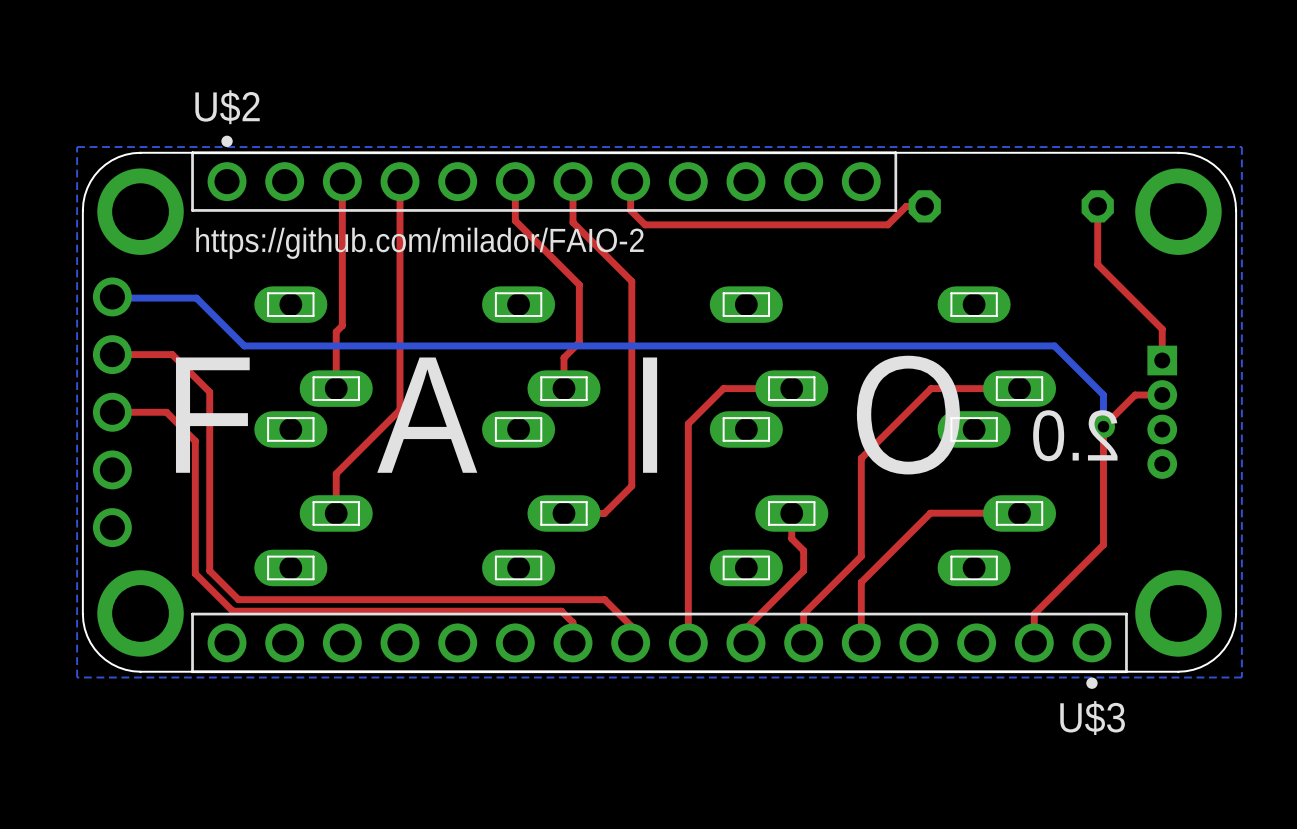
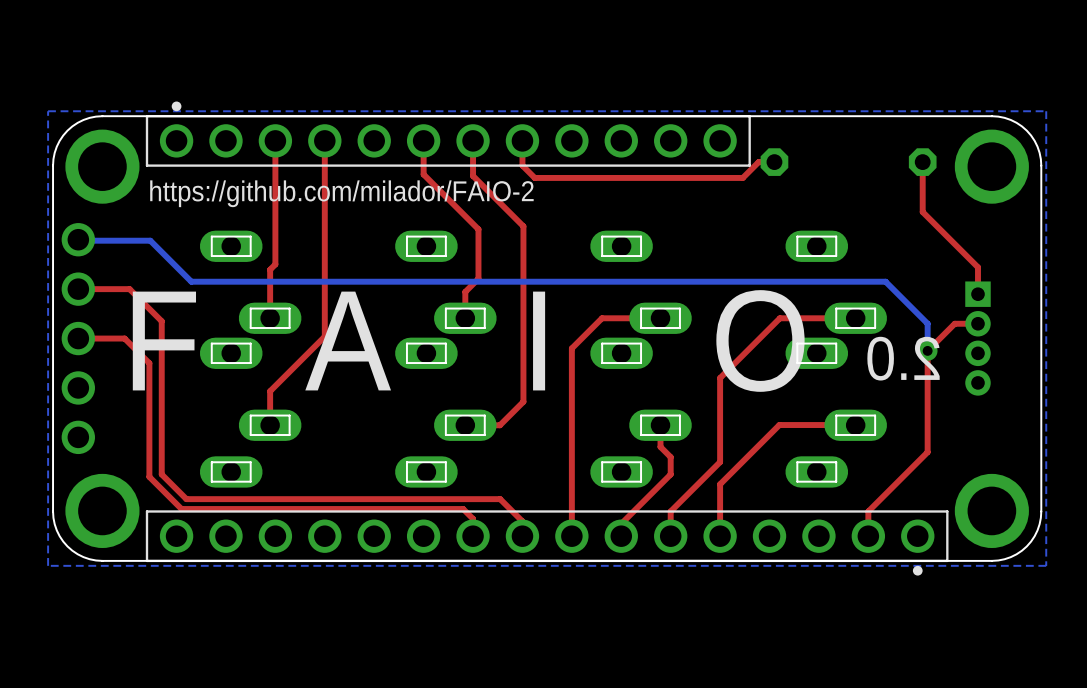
U$2 name: U$2 (227, 107) -> none
U$3 name: U$3 (1092, 718) -> none

